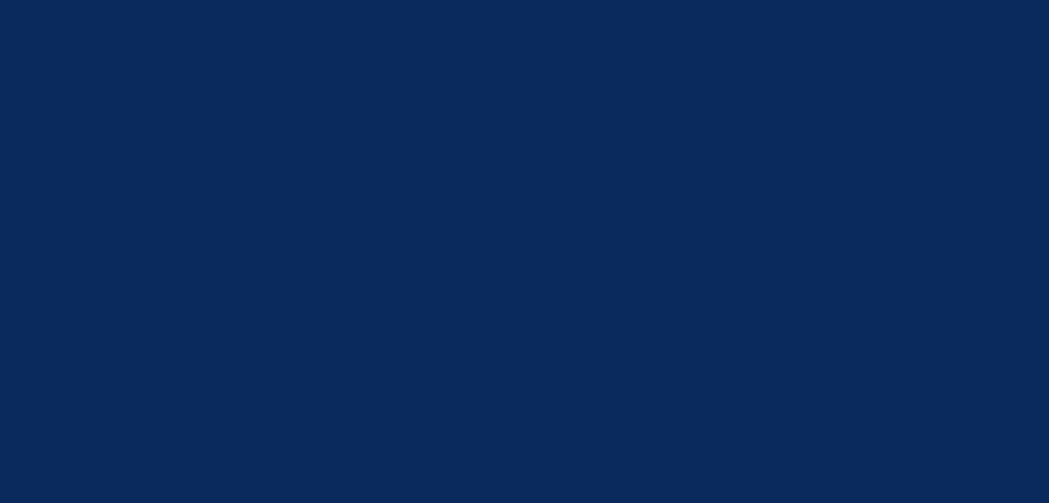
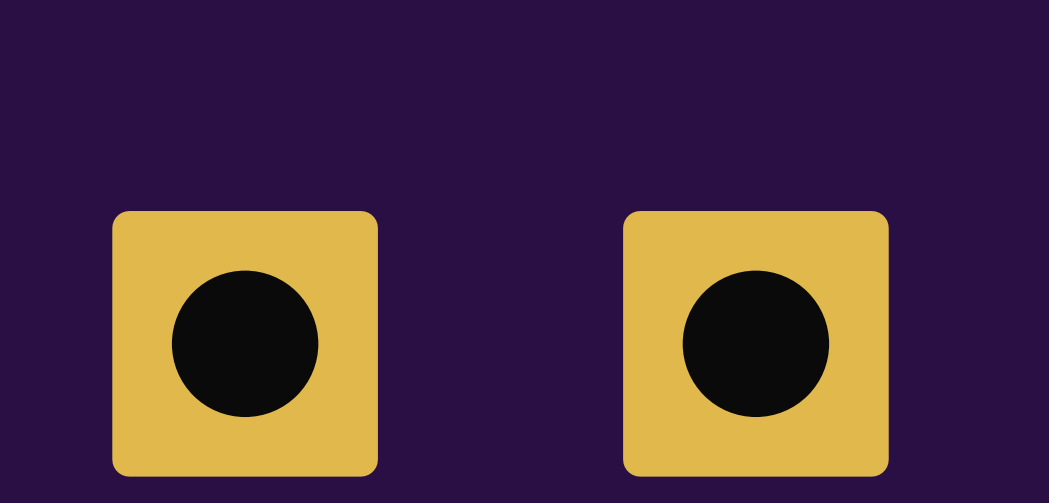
part: none -> (245, 343)
part: none -> (755, 343)

